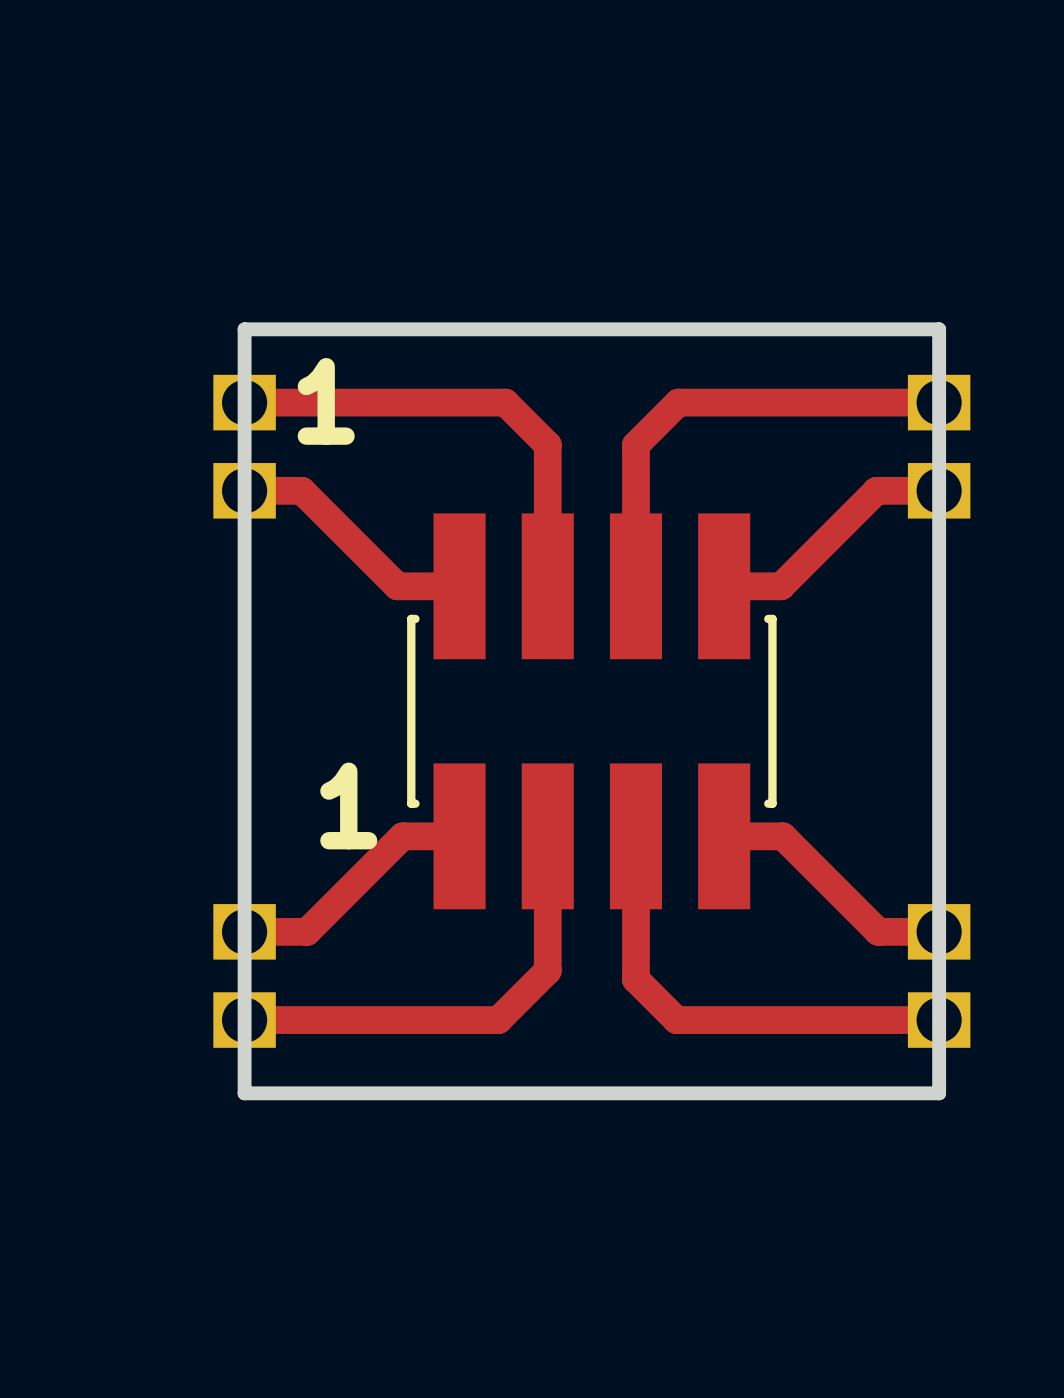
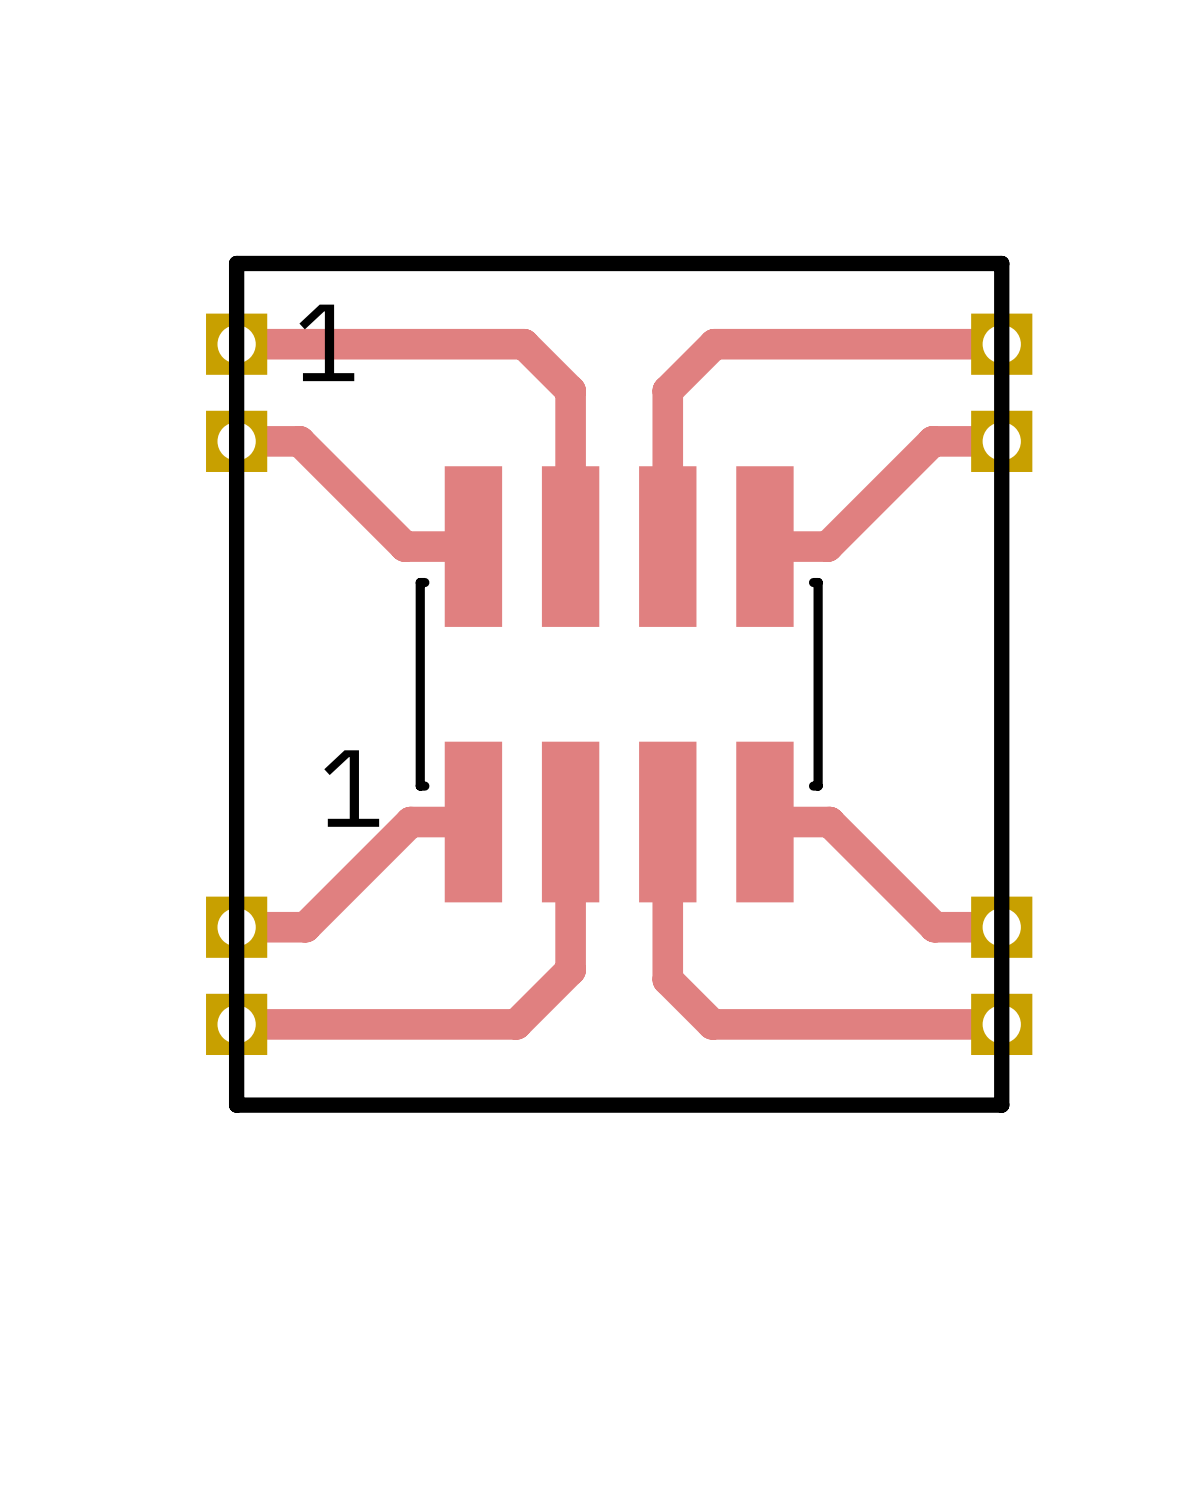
part footprint: [213, 374, 276, 431] -> [206, 313, 268, 375]
part footprint: [907, 374, 971, 431] -> [971, 313, 1033, 375]
part footprint: [213, 463, 276, 519] -> [206, 410, 268, 472]
part footprint: [907, 463, 971, 519] -> [971, 410, 1033, 472]
part footprint: [213, 904, 276, 960] -> [206, 896, 268, 958]
part footprint: [907, 904, 971, 960] -> [971, 896, 1033, 958]
part footprint: [213, 992, 276, 1048] -> [206, 993, 268, 1056]
part footprint: [907, 992, 971, 1048] -> [971, 993, 1033, 1056]

